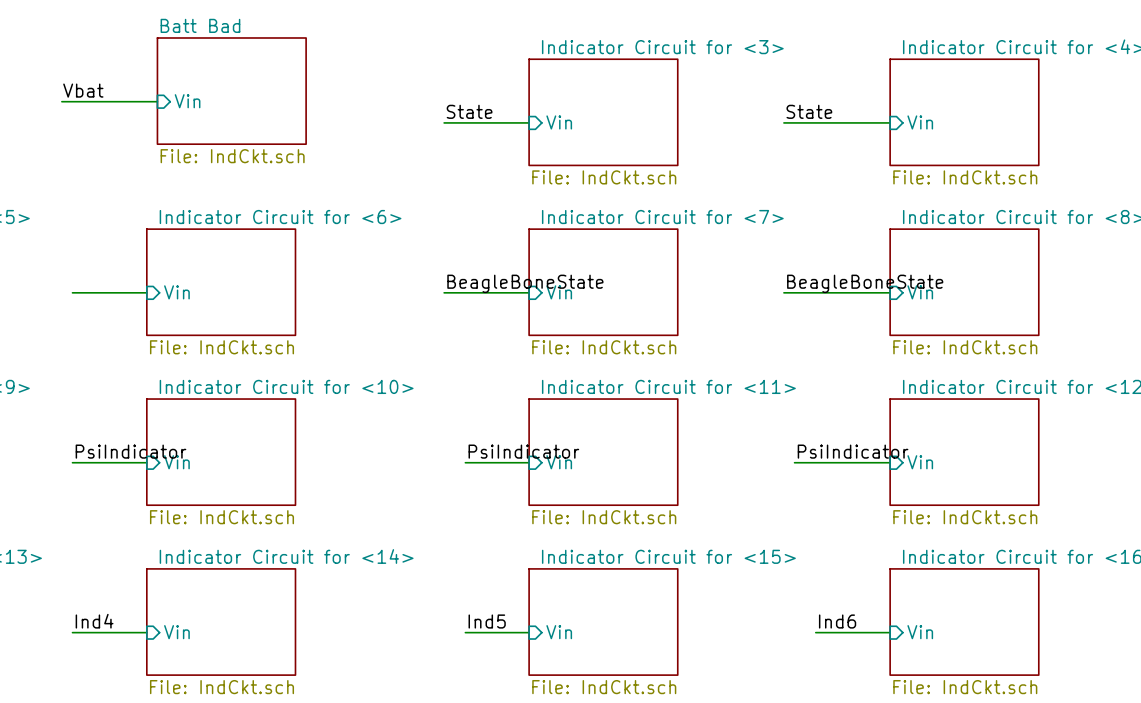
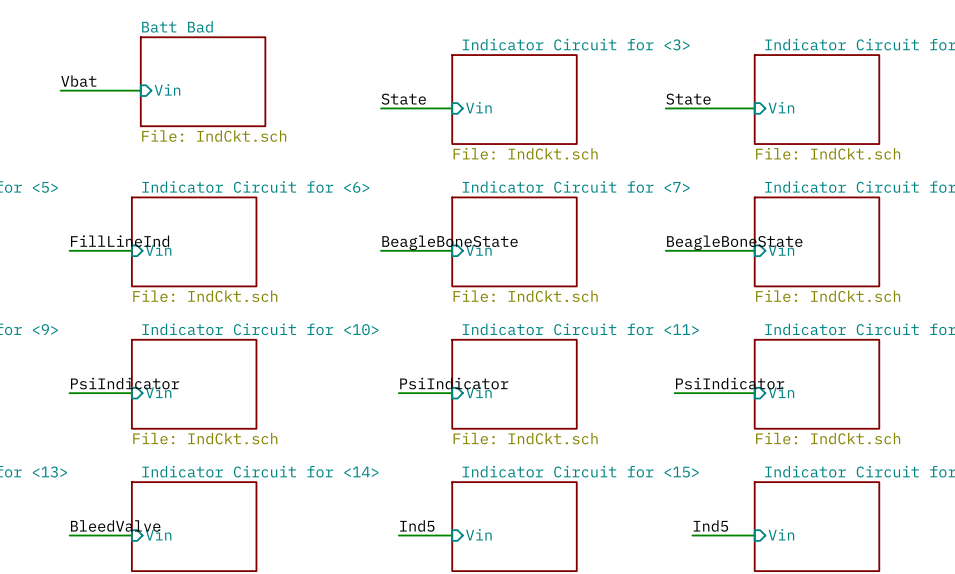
label: none -> FillLineInd (120, 241)
label: Ind4 (94, 621) -> BleedValve (115, 525)
label: Ind6 (837, 621) -> Ind5 (710, 525)

